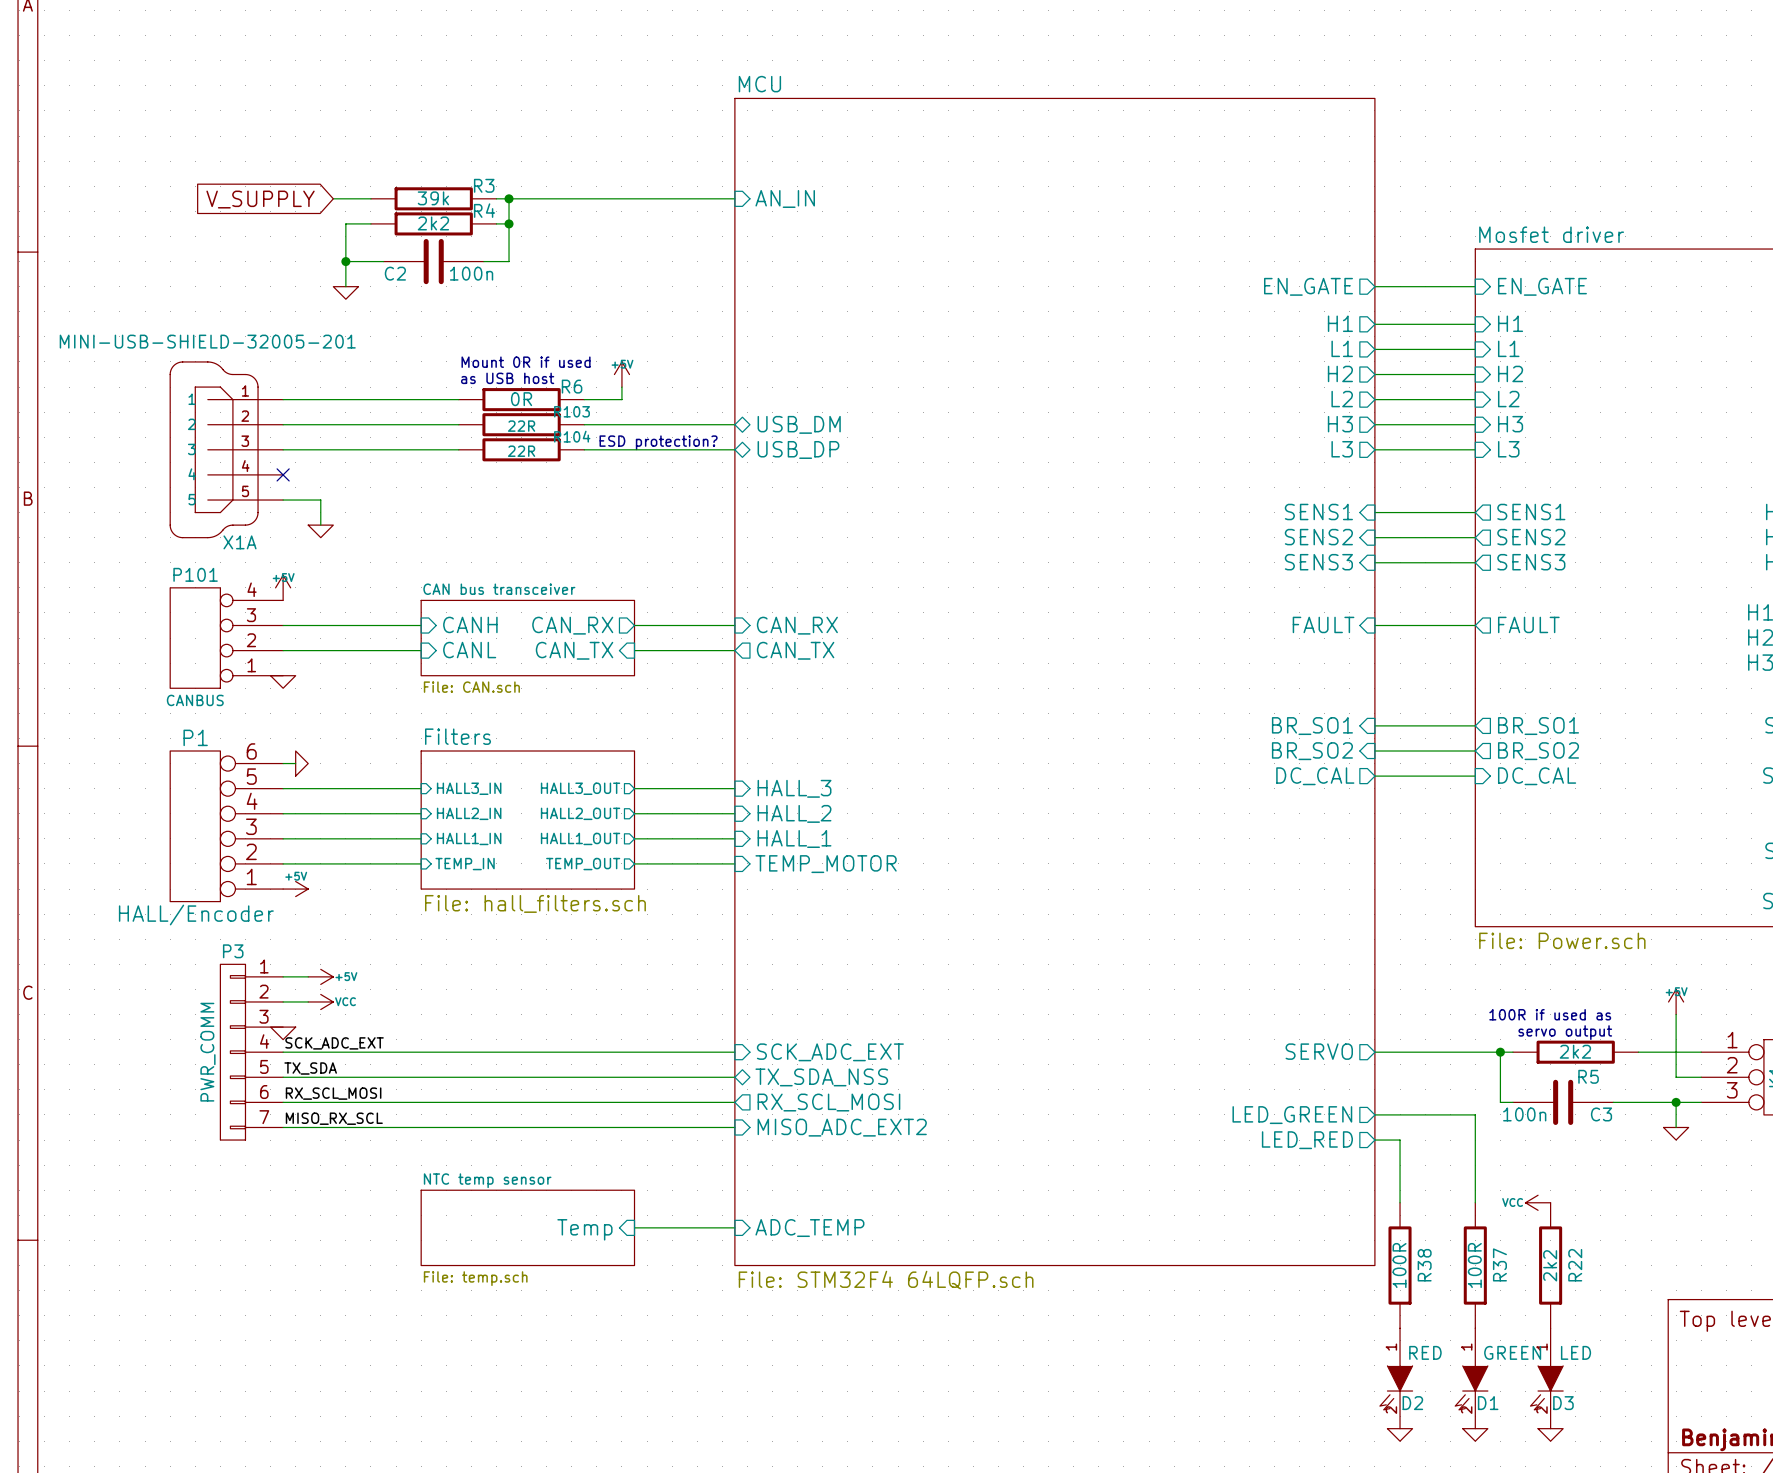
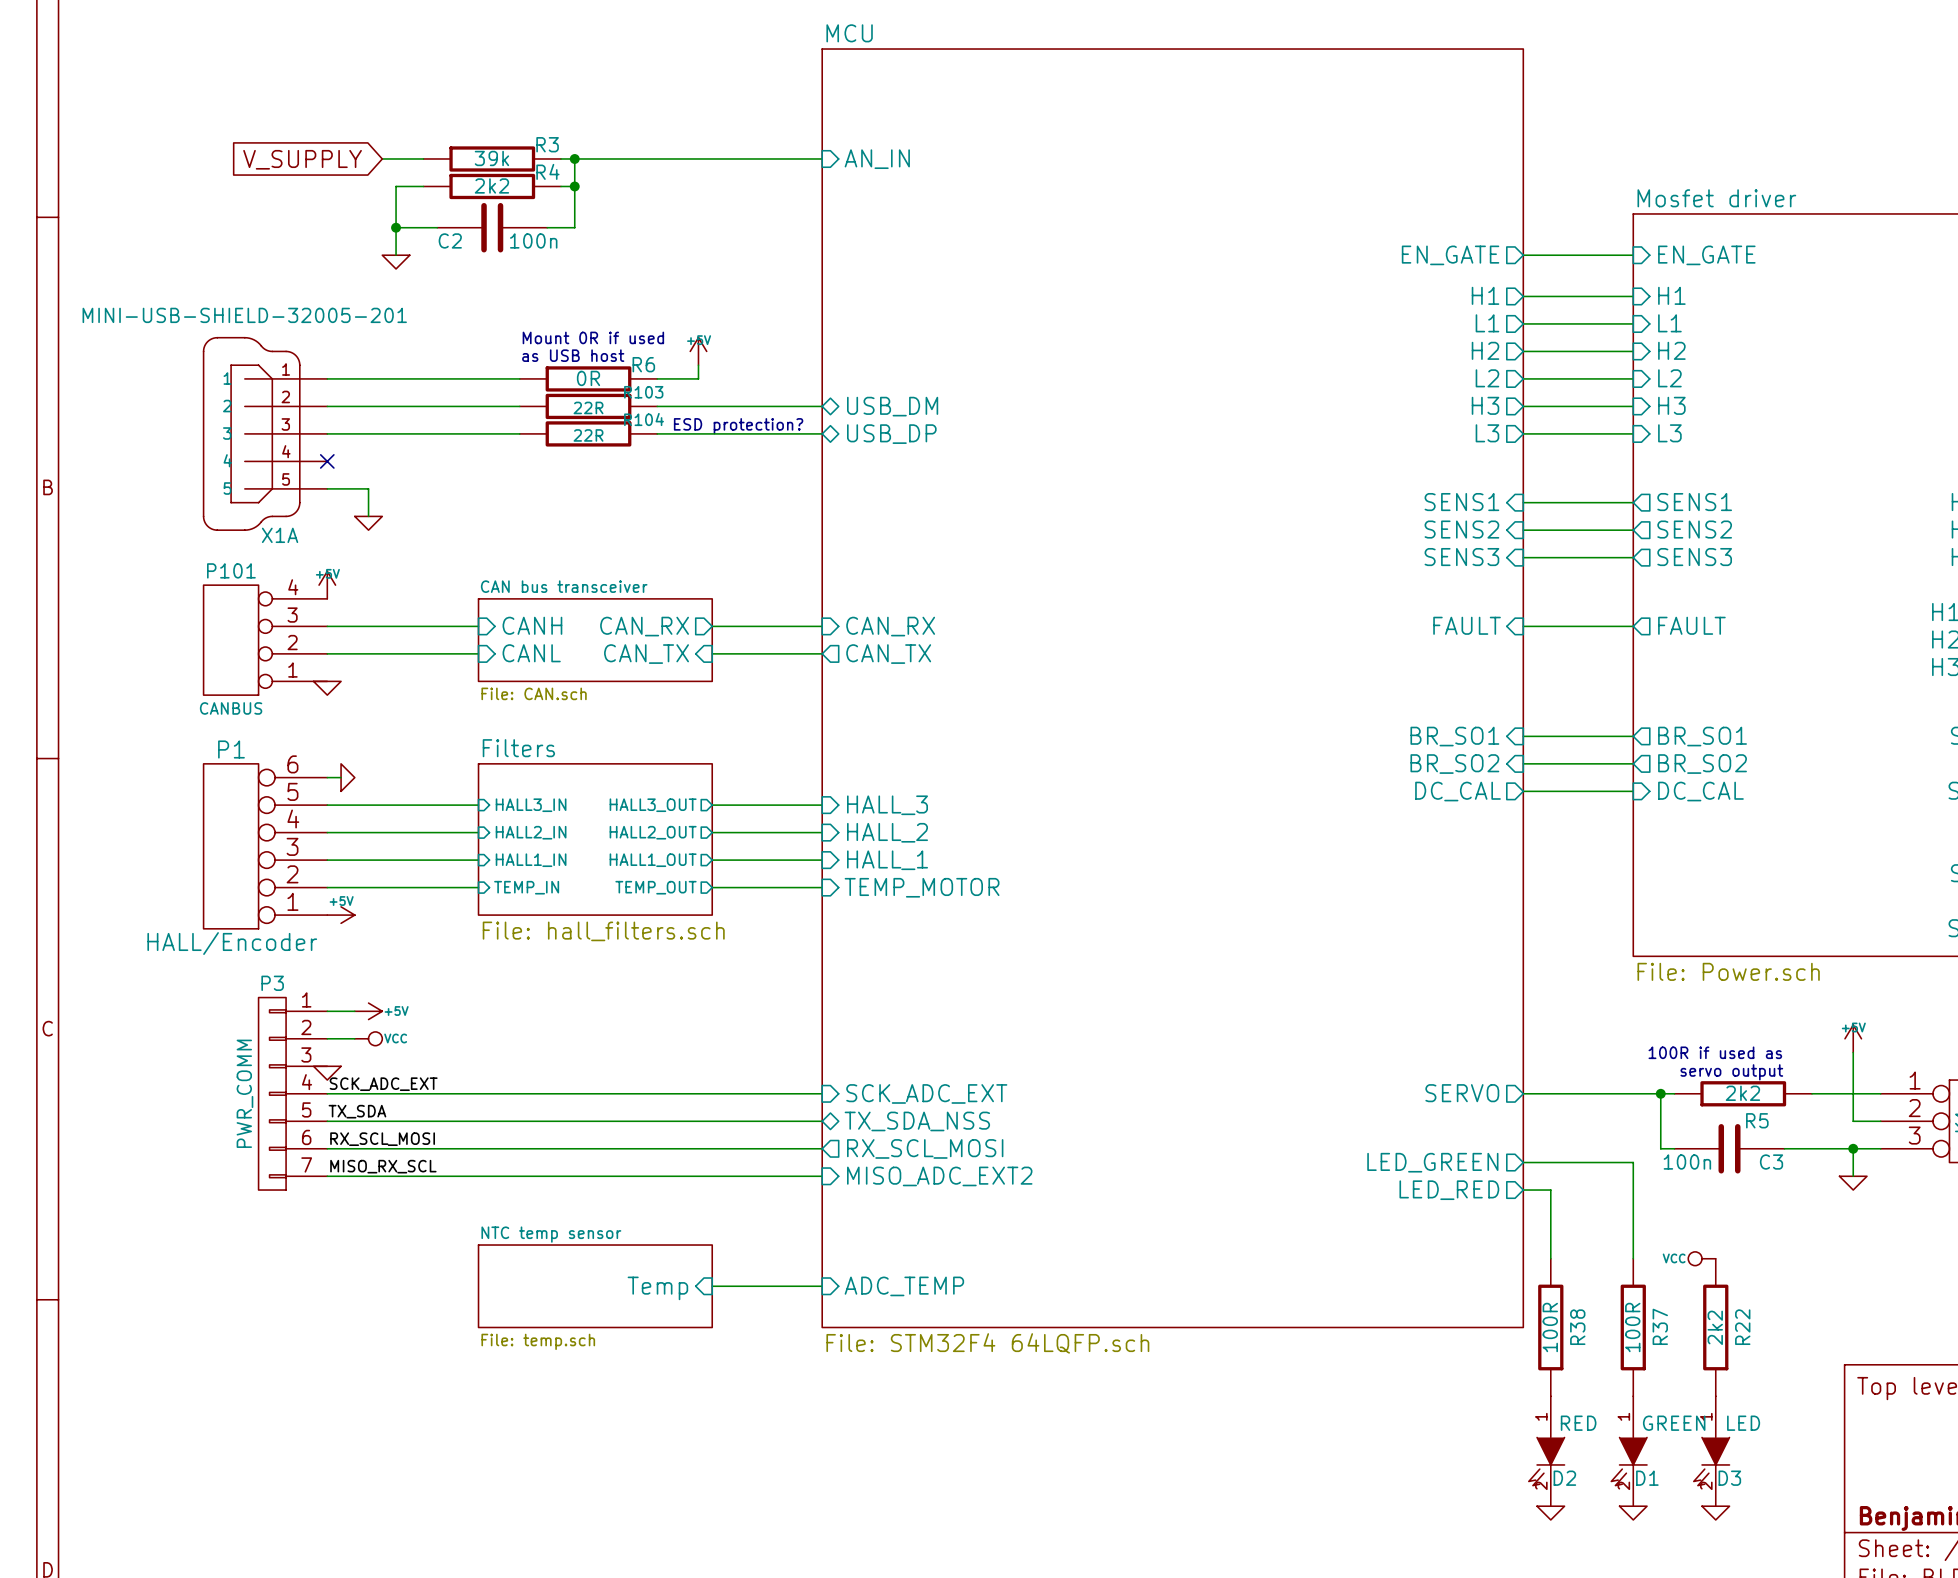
power symbol shape: [308, 994, 334, 1010] -> [354, 1031, 383, 1046]
power symbol shape: [1525, 1195, 1551, 1211] -> [1688, 1251, 1716, 1266]

